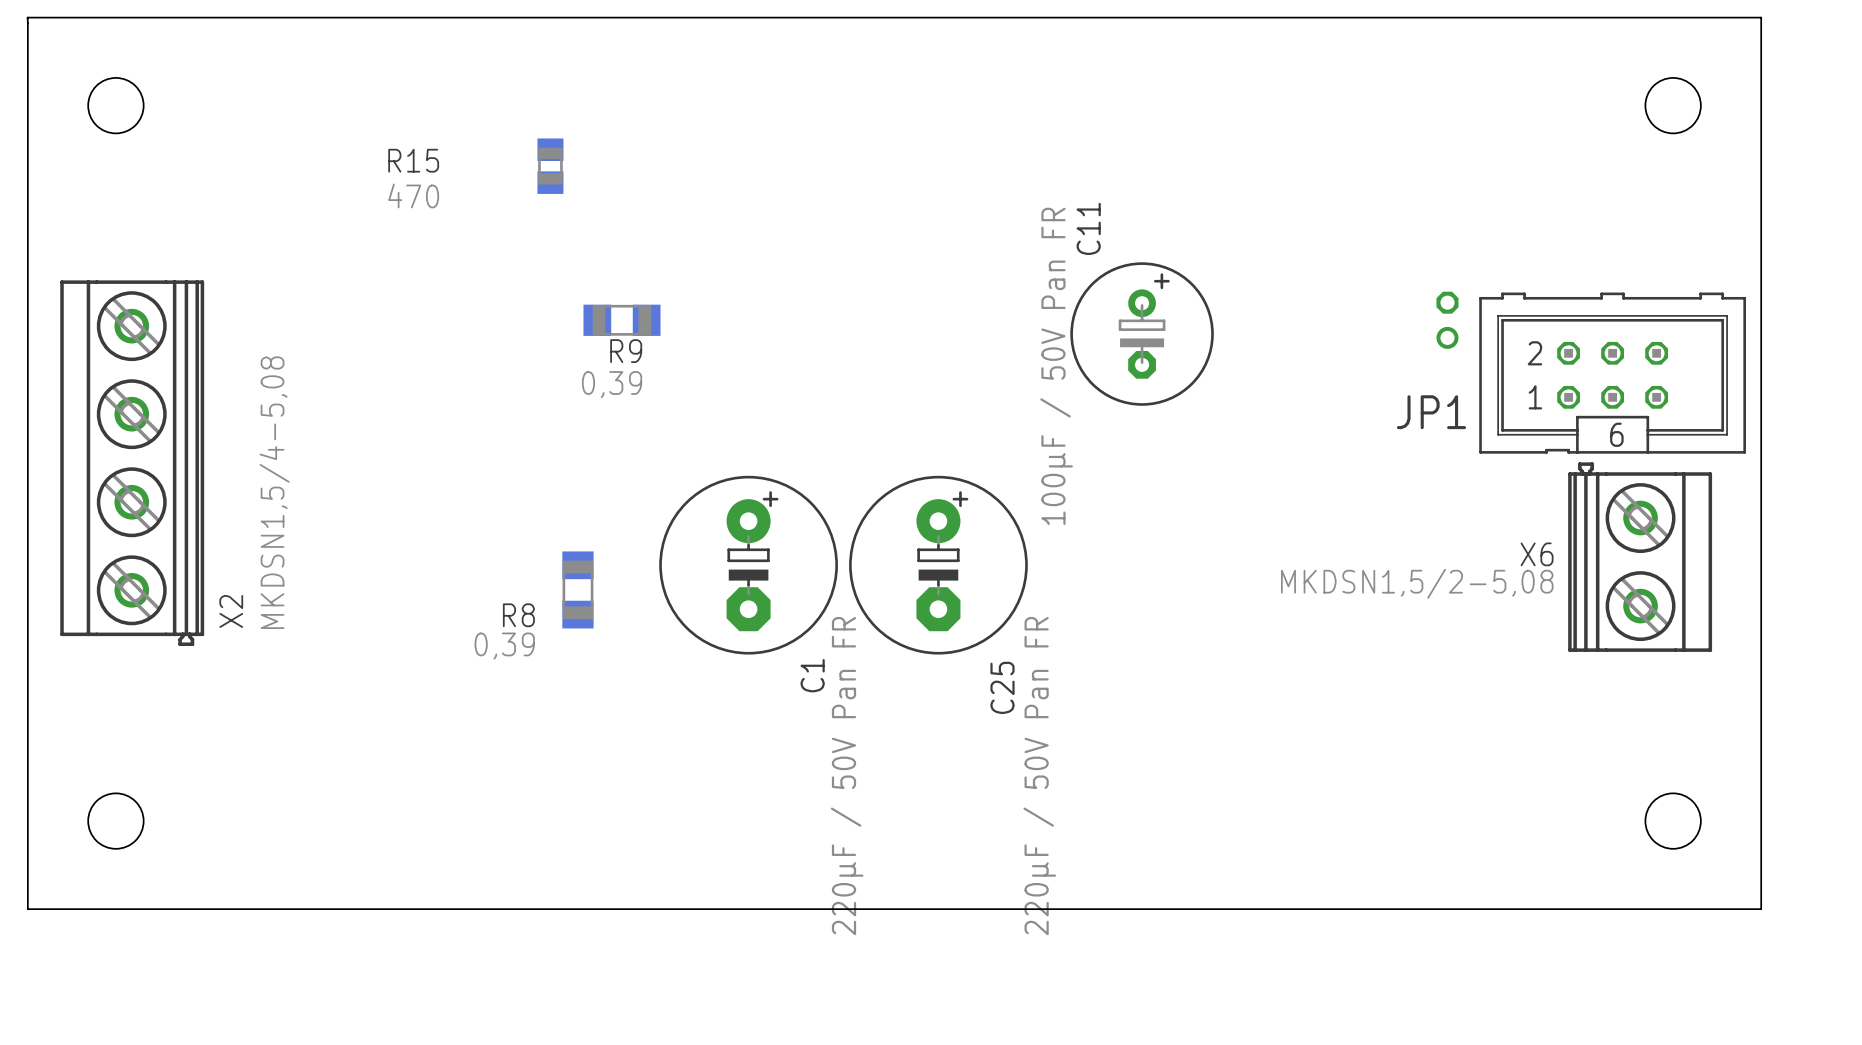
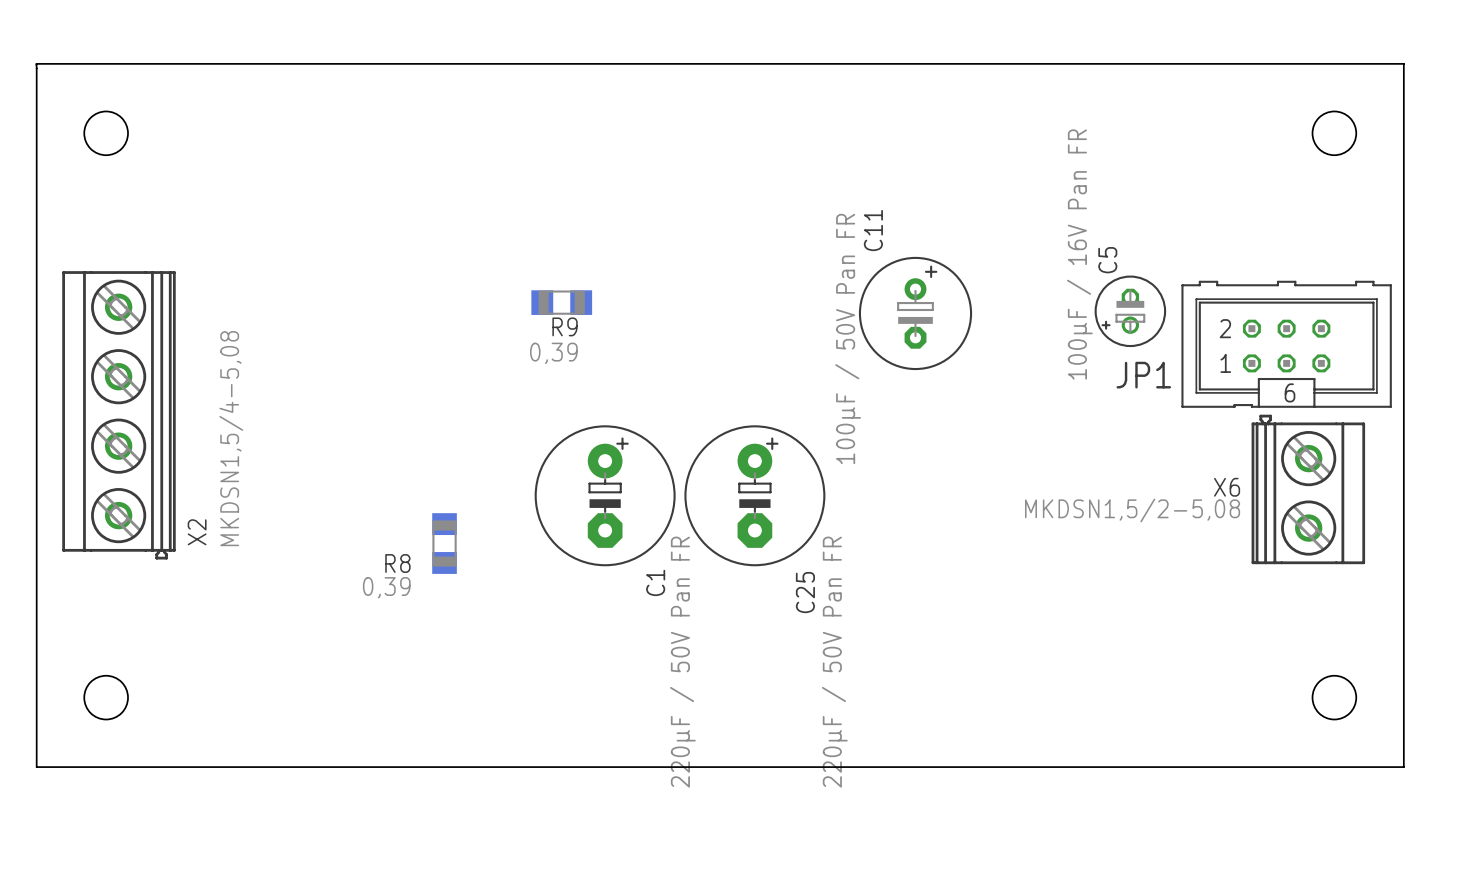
R15: 470 (550, 166) -> none
R9 position: (622, 320) -> (561, 302)
C5 side: top (1447, 320) -> bottom (1130, 311)
R8 position: (577, 589) -> (444, 543)

